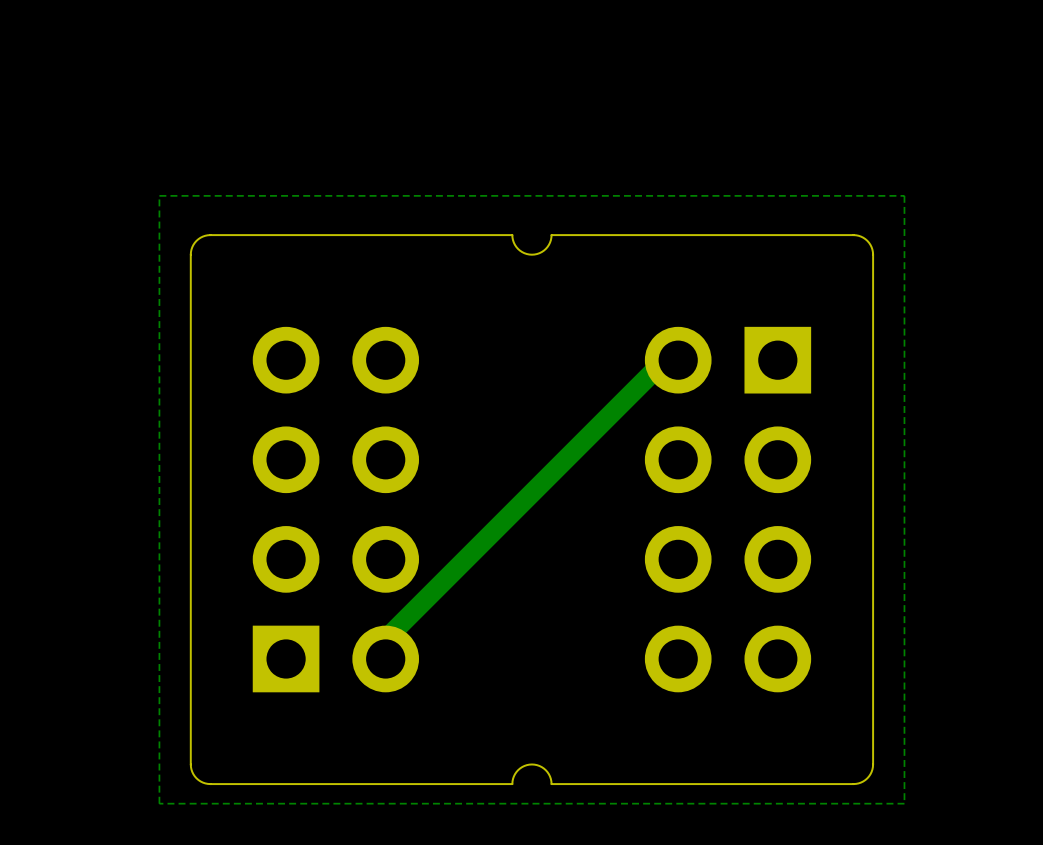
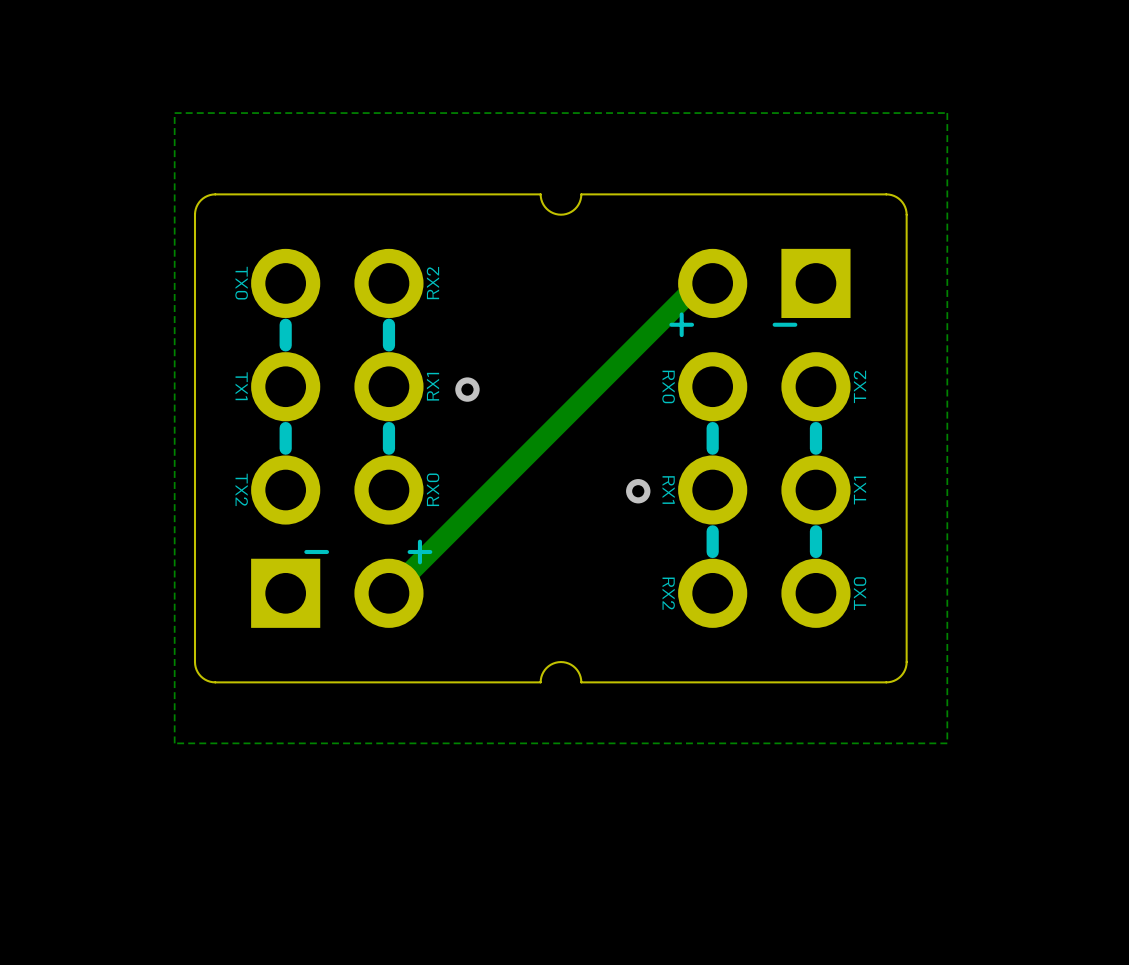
board edge: (853, 235) (551, 235) (545, 248) (531, 254) (518, 248) (512, 235) (210, 235) (198, 239) (192, 247) (190, 254) (190, 764) (194, 776) (202, 782) (210, 784) (512, 784) (518, 770) (531, 764) (545, 770) (551, 784) (853, 784) (865, 780) (870, 774) (873, 764) (873, 254) (867, 240) (853, 235) -> (886, 194) (894, 195) (900, 200) (905, 206) (906, 214) (906, 662) (903, 672) (898, 678) (886, 682) (581, 682) (579, 674) (575, 667) (568, 663) (560, 662) (553, 663) (546, 667) (542, 674) (540, 682) (215, 682) (205, 679) (199, 674) (194, 662) (194, 214) (197, 204) (202, 198) (215, 194) (540, 194) (542, 202) (546, 208) (553, 213) (560, 214) (568, 213) (575, 208) (579, 202) (581, 194) (886, 194)
part footprint: [252, 326, 420, 693] -> [251, 248, 433, 628]
part footprint: [644, 326, 812, 693] -> [669, 248, 851, 628]
via: none -> (467, 389)
via: none -> (638, 491)

